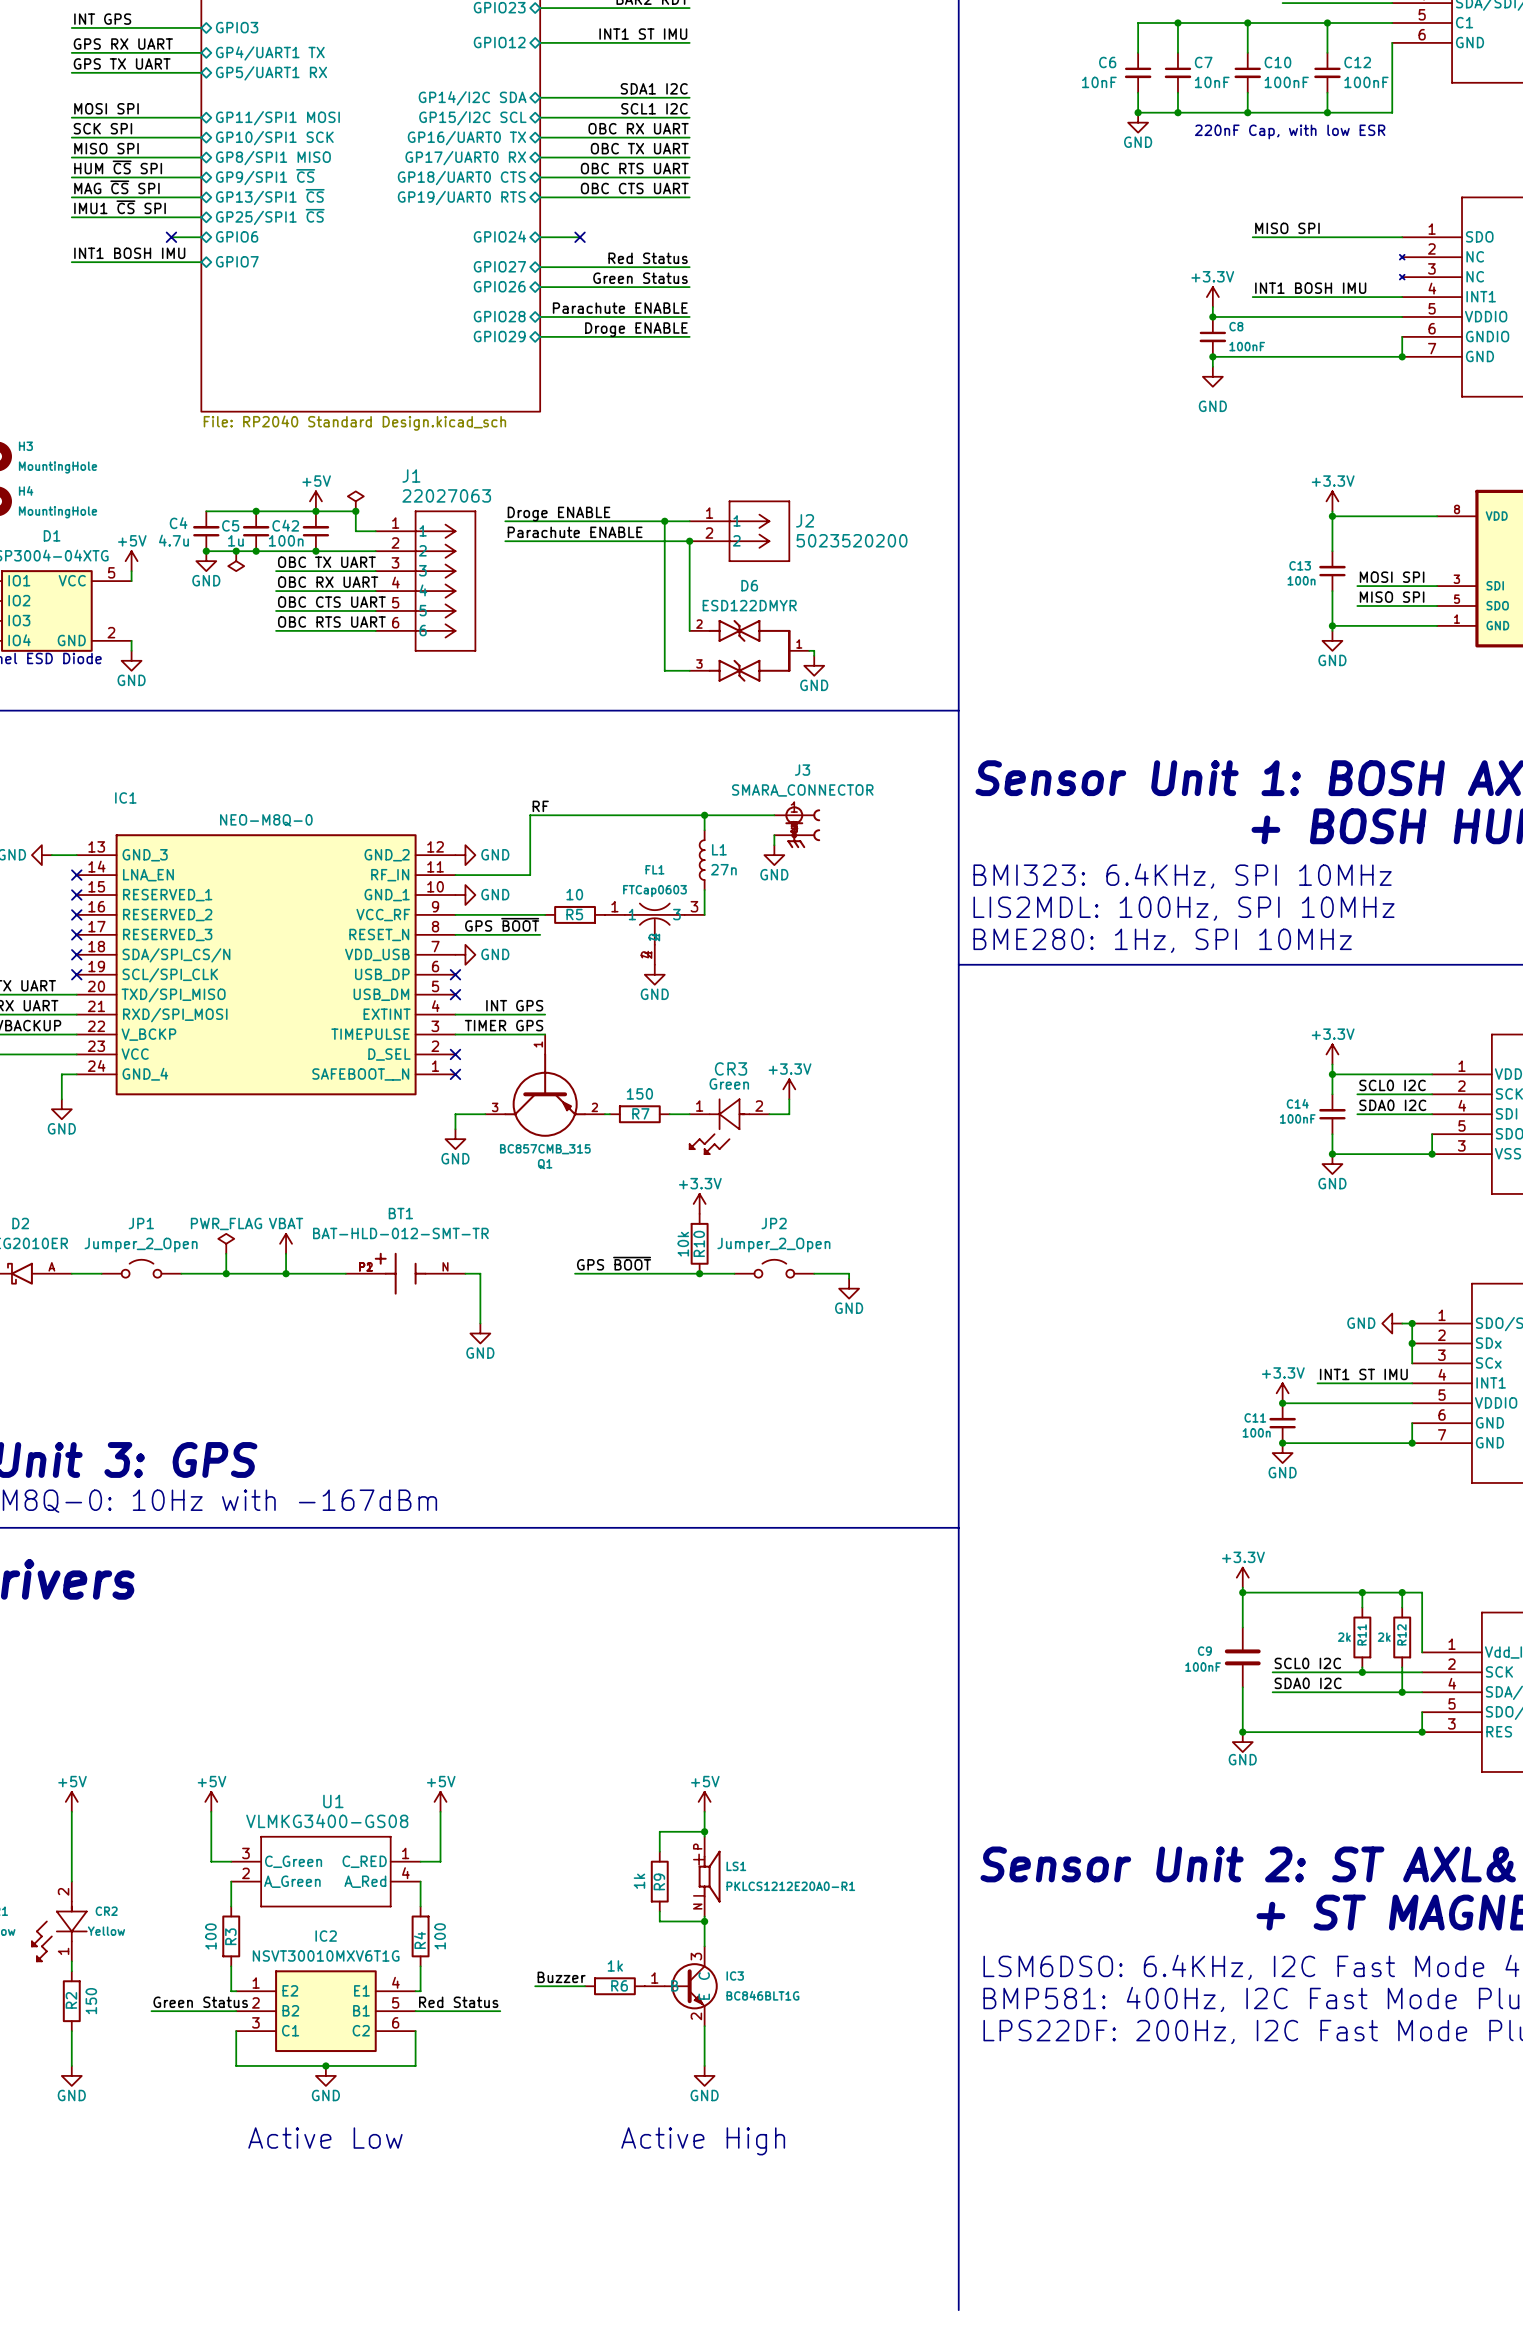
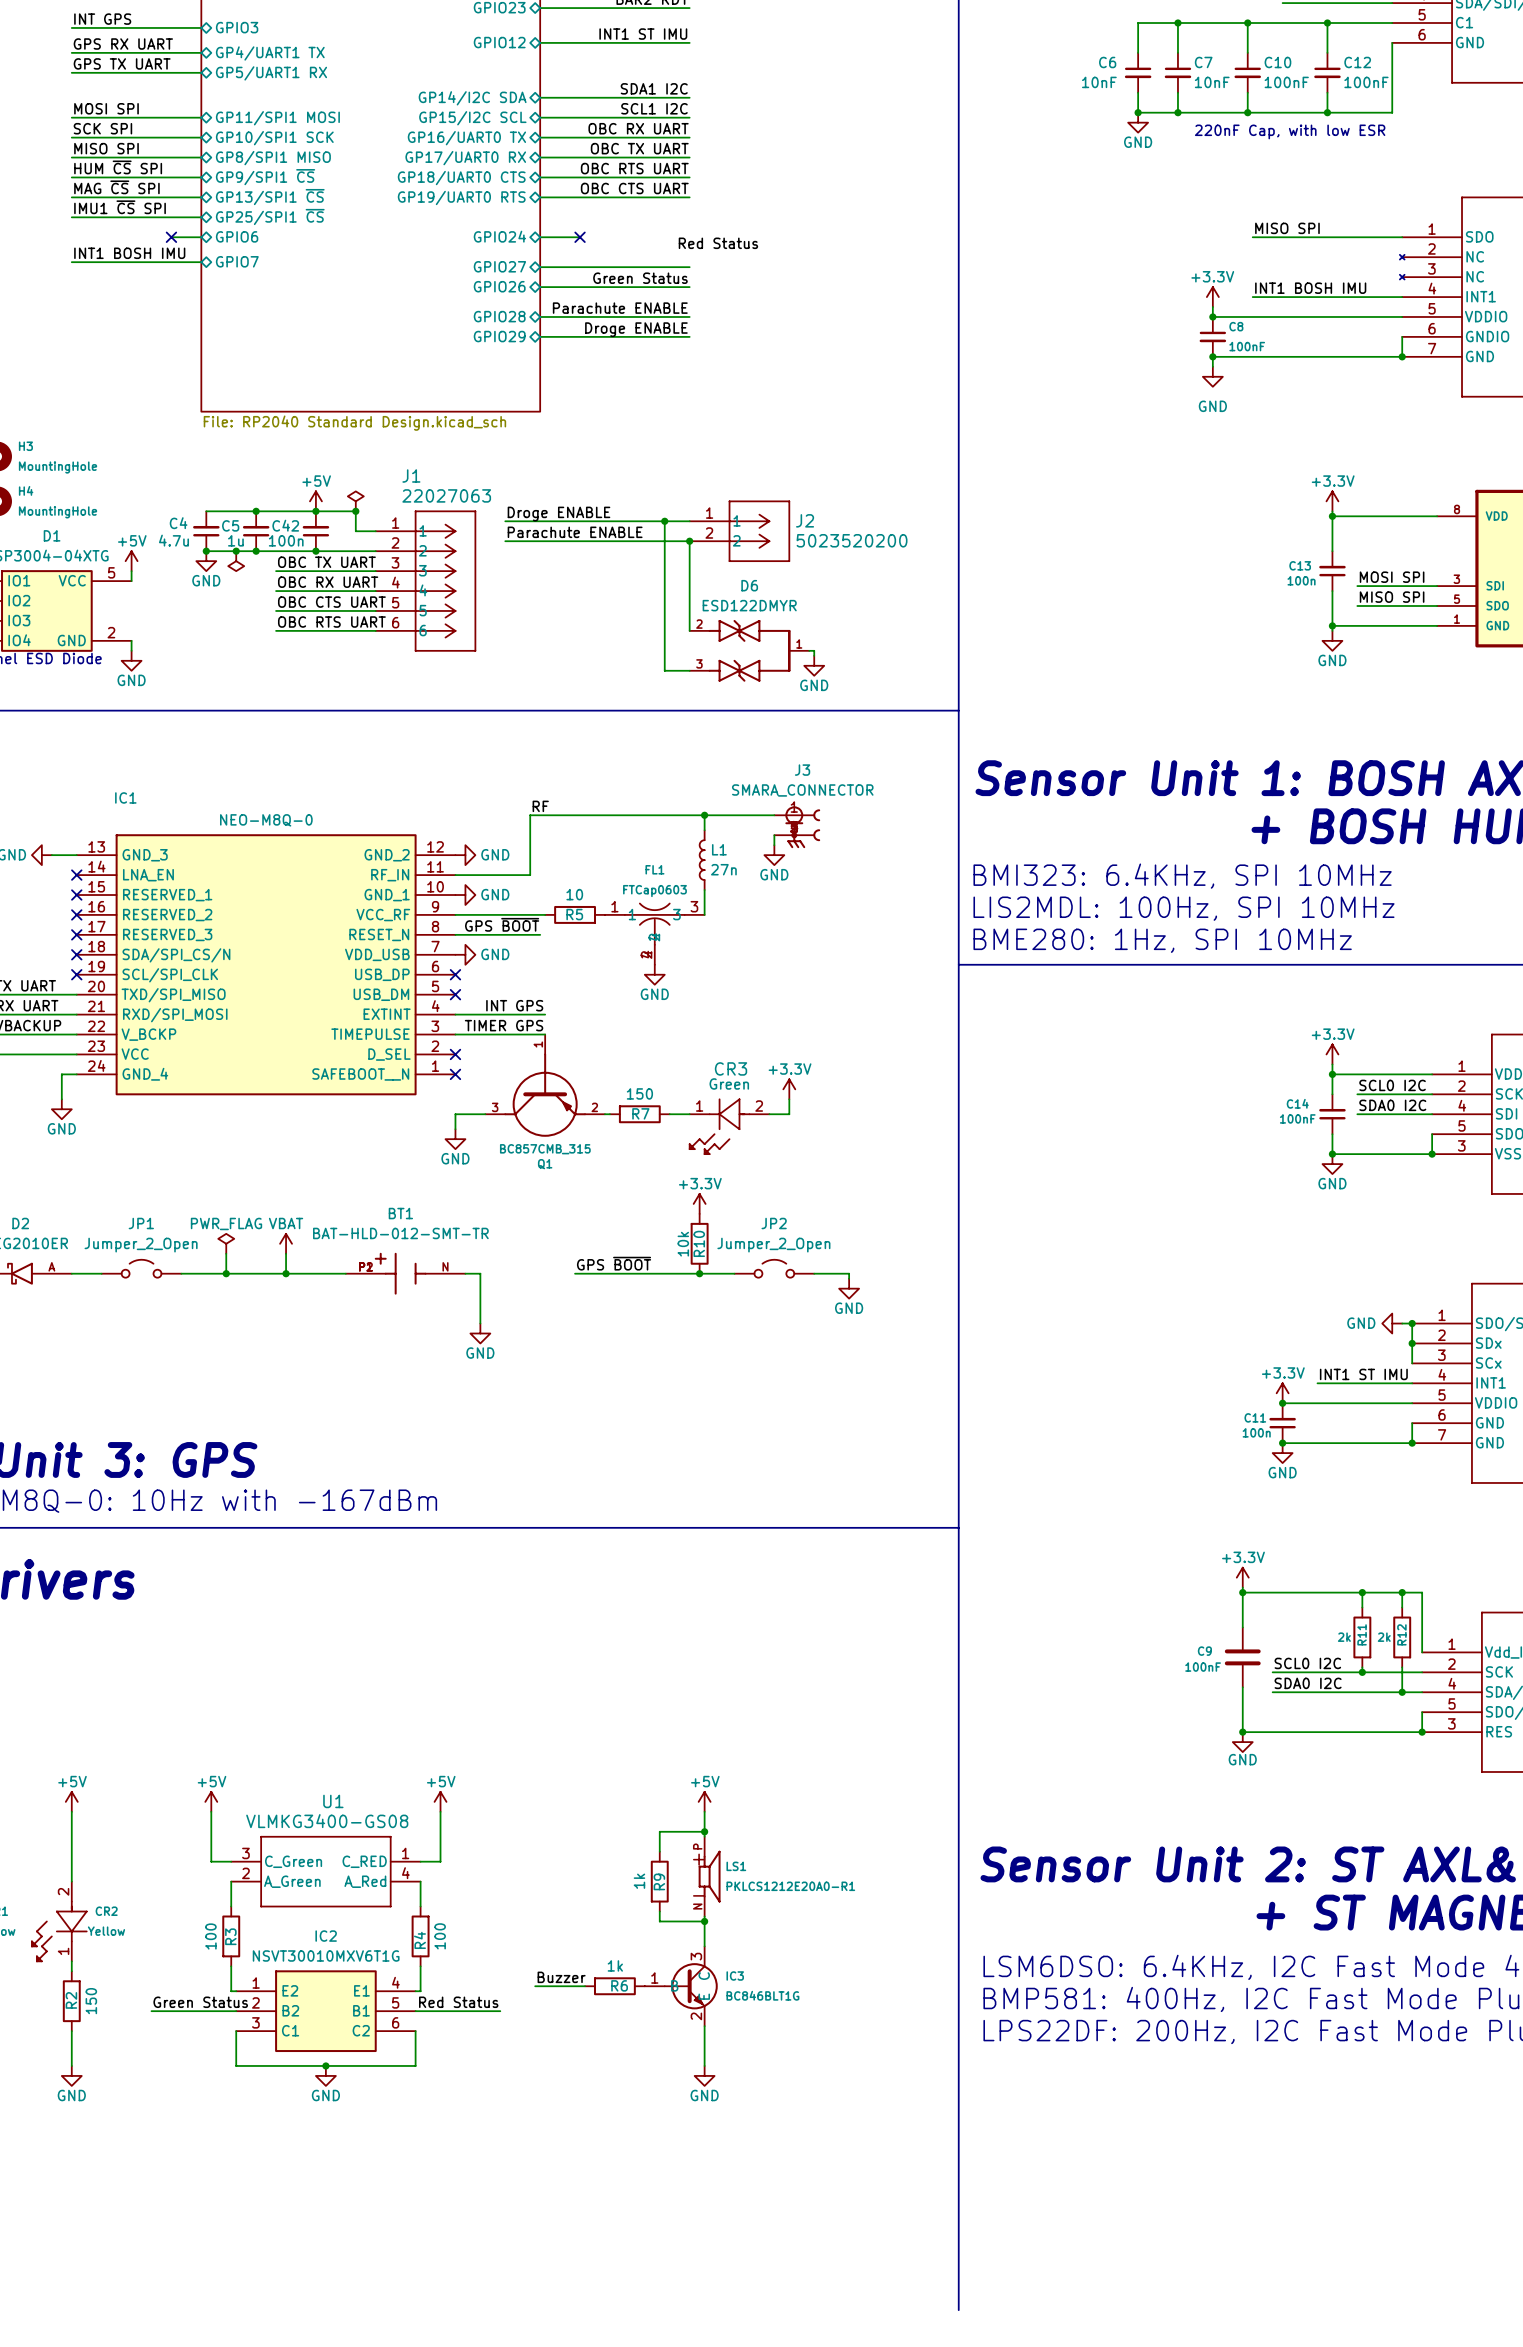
label position: Red Status (648, 258) -> Red Status (718, 243)
text: Active Low (325, 2138) -> none
text: Active High (703, 2141) -> none

